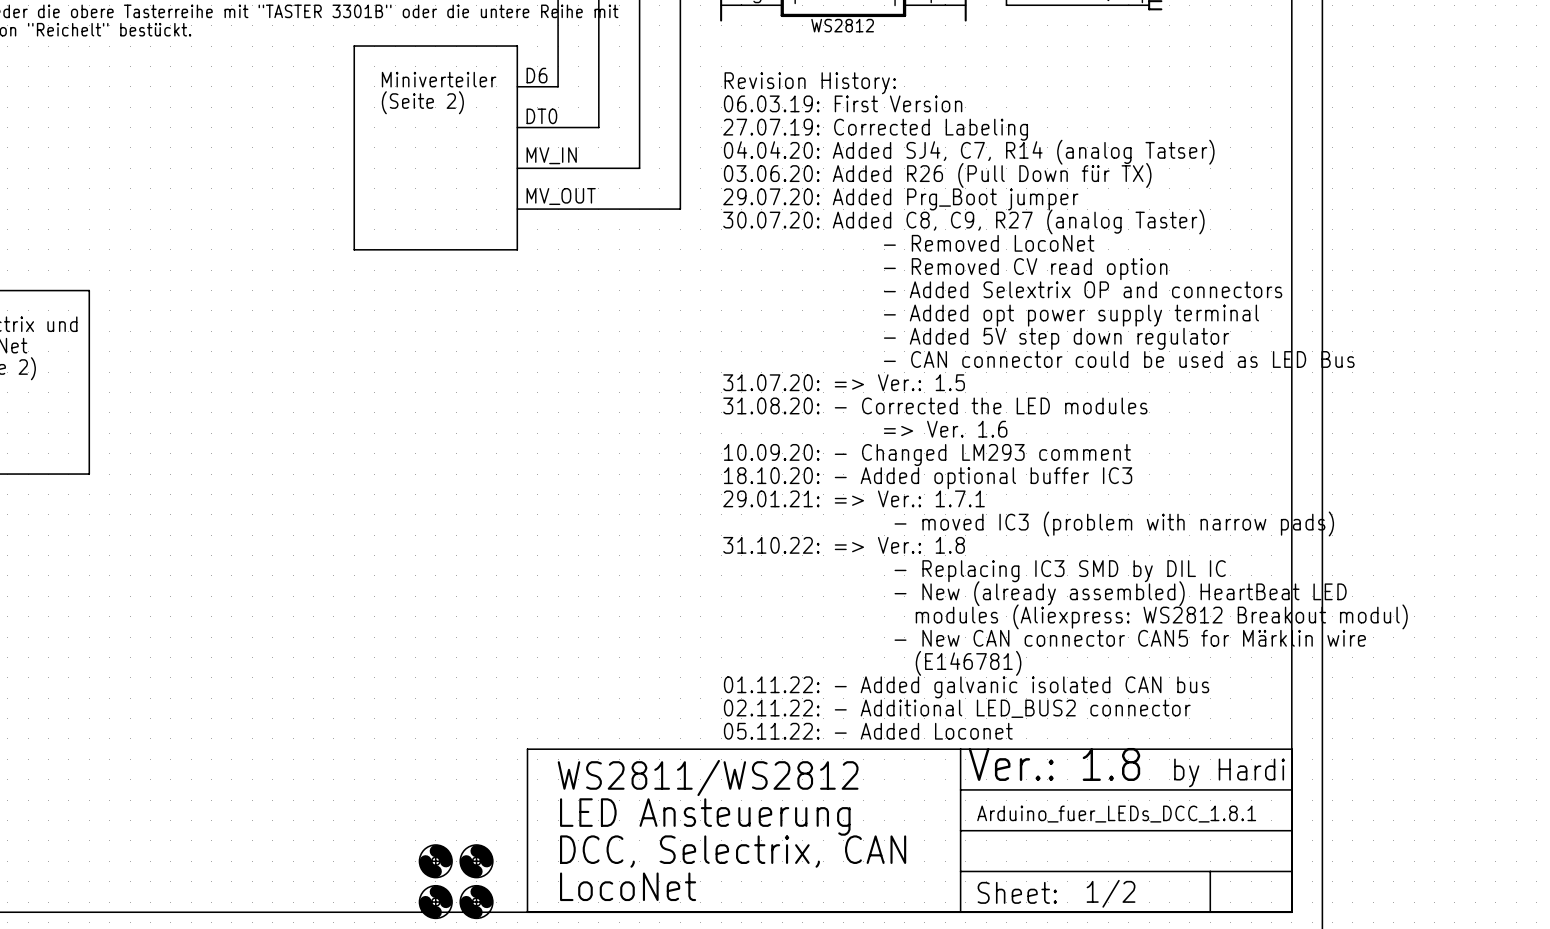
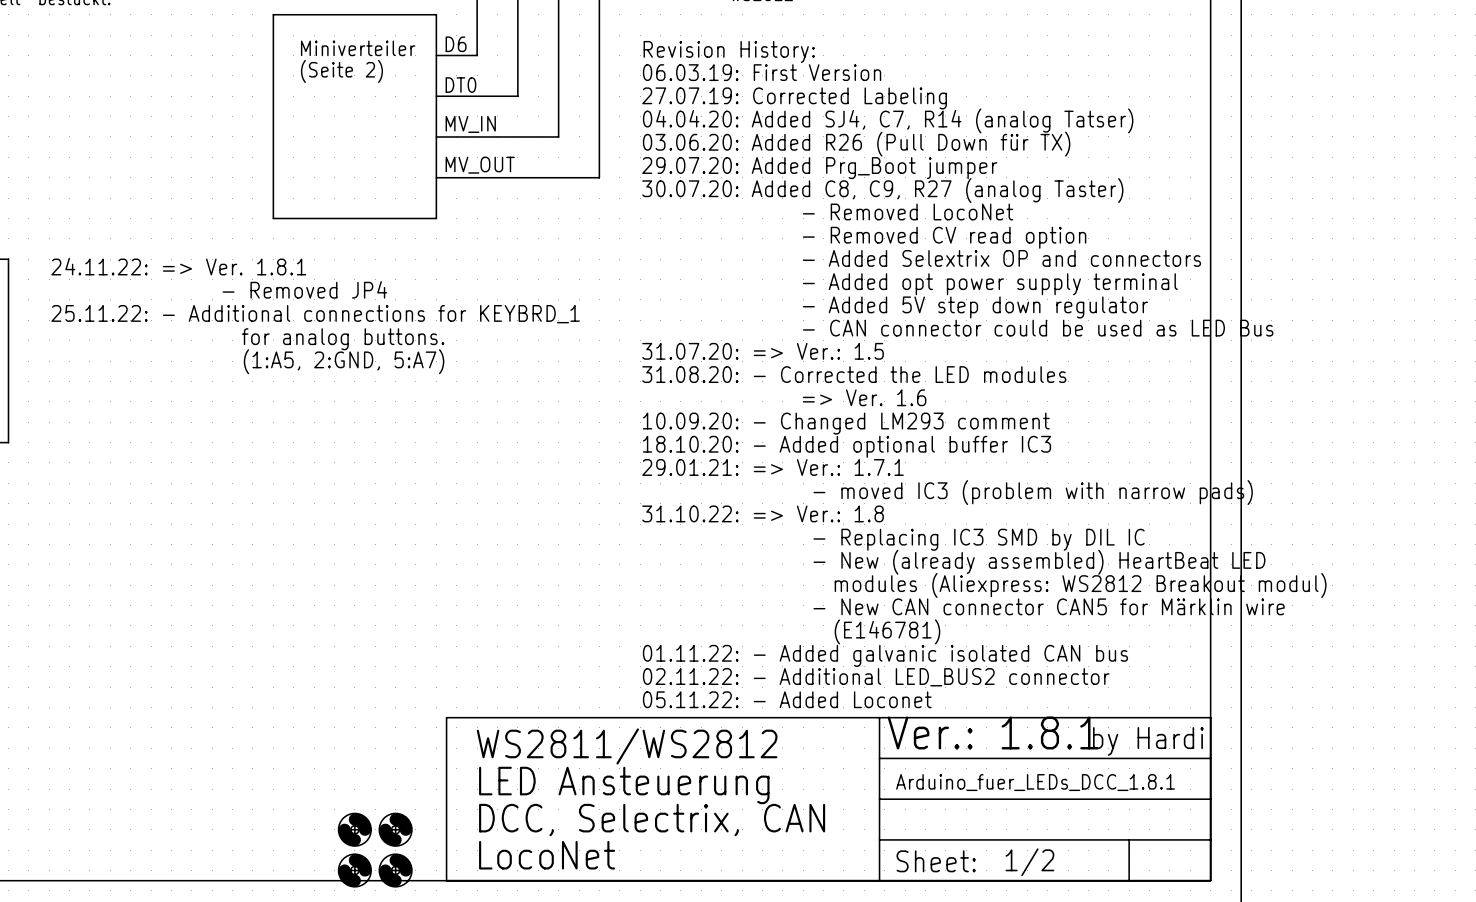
text: none -> 24.11.22: => Ver. 1.8.1 (178, 266)
text: none -> - Removed JP4 (304, 289)
text: none -> 25.11.22: - Additional connections for KEYBRD_1 (315, 314)
text: none -> for analog buttons. (343, 339)
text: none -> (1:A5, 2:GND, 5:A7) (344, 361)
text: Ver.: 1.8 (1054, 764) -> Ver.: 1.8.1 (992, 732)

